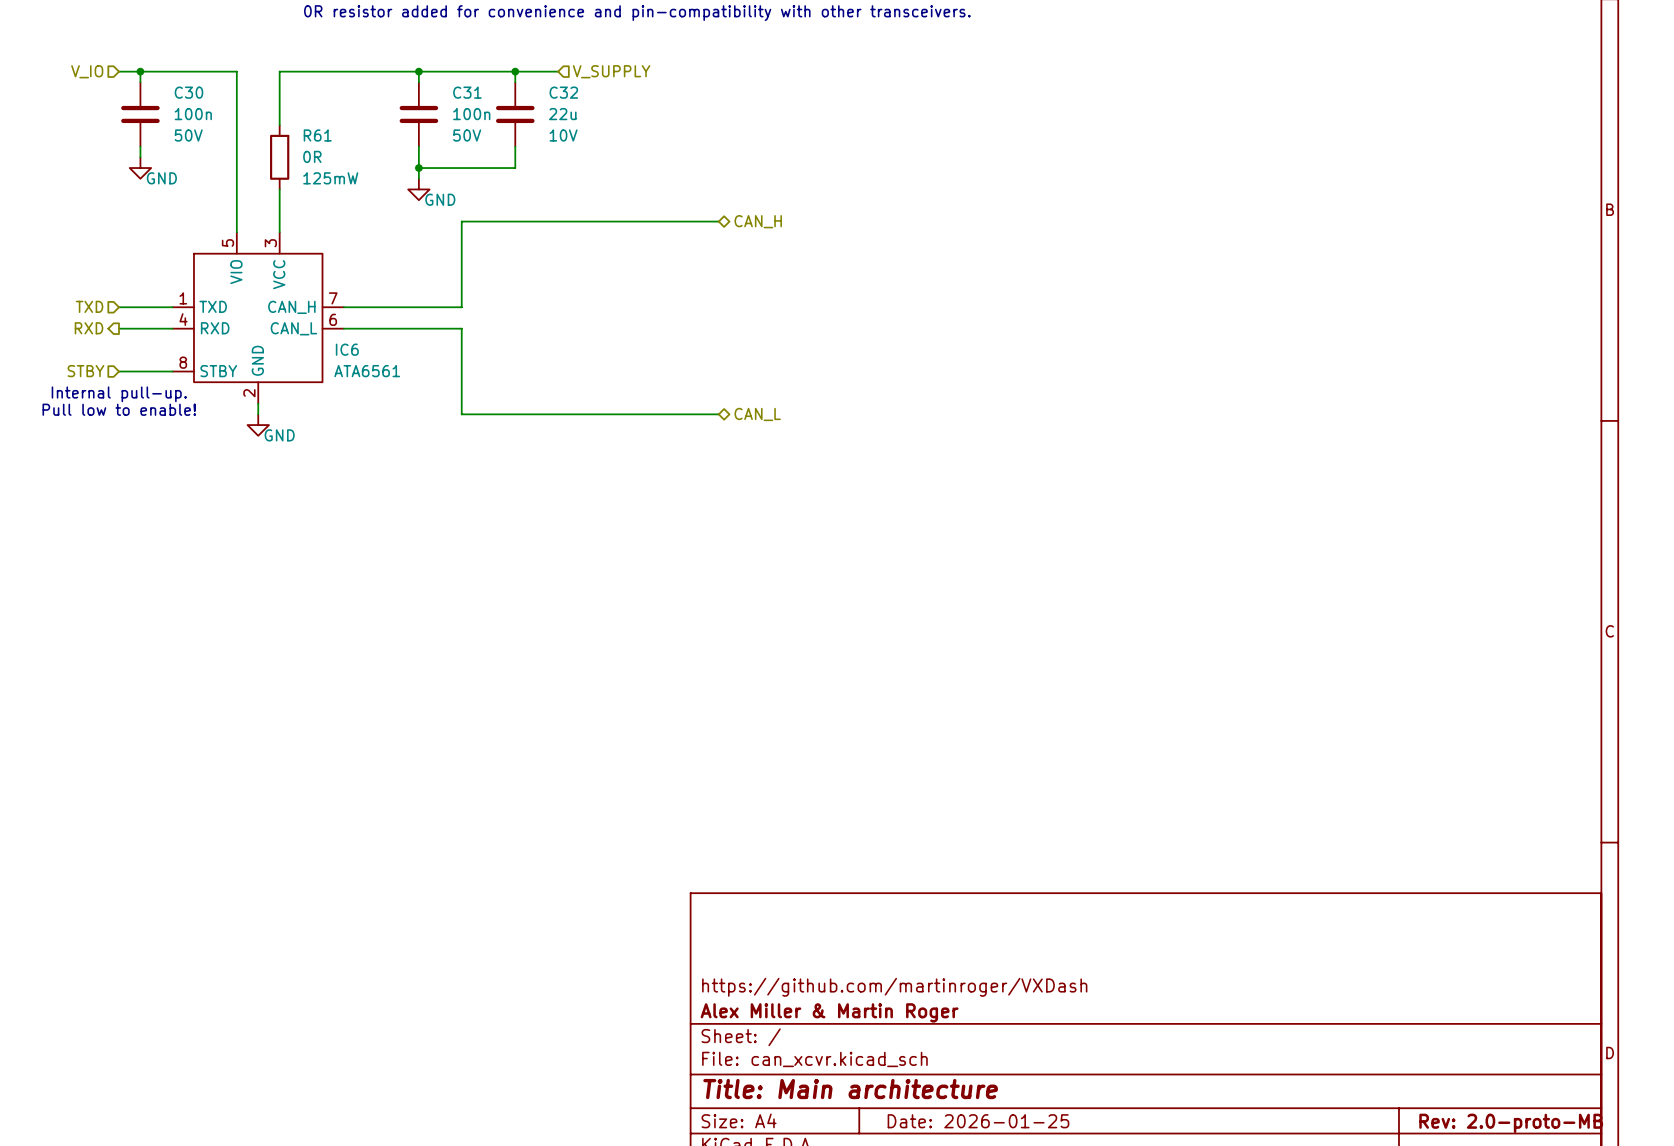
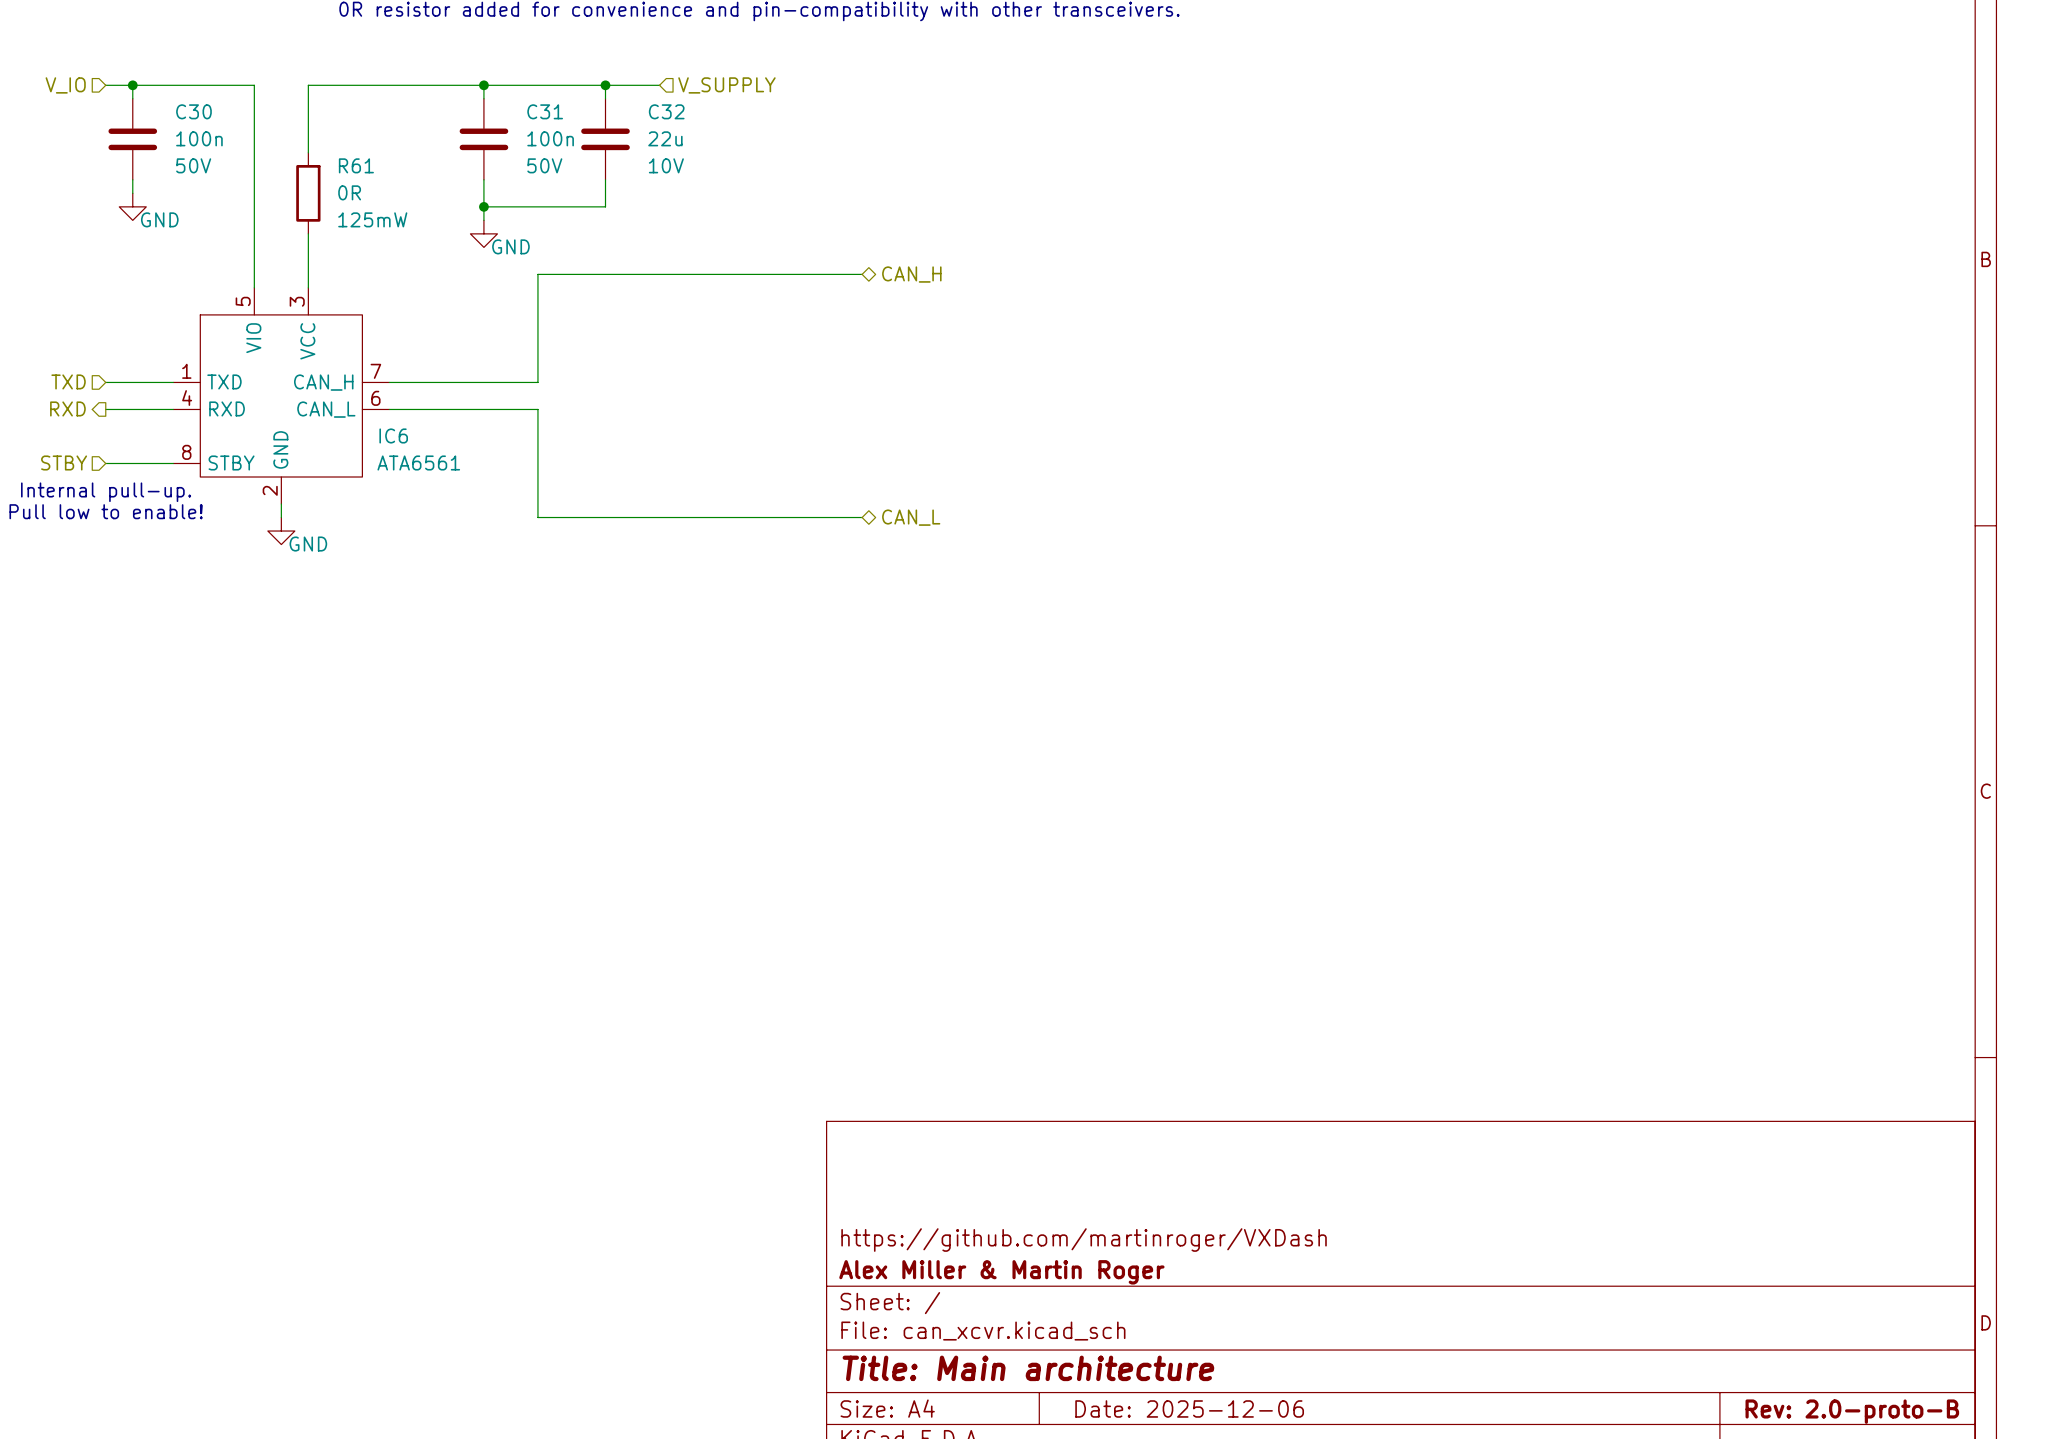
title block: Date: 2026-01-25 (978, 1121) -> Date: 2025-12-06 (1189, 1408)
title block: Rev: 2.0-proto-MB (1511, 1123) -> Rev: 2.0-proto-B (1852, 1411)

